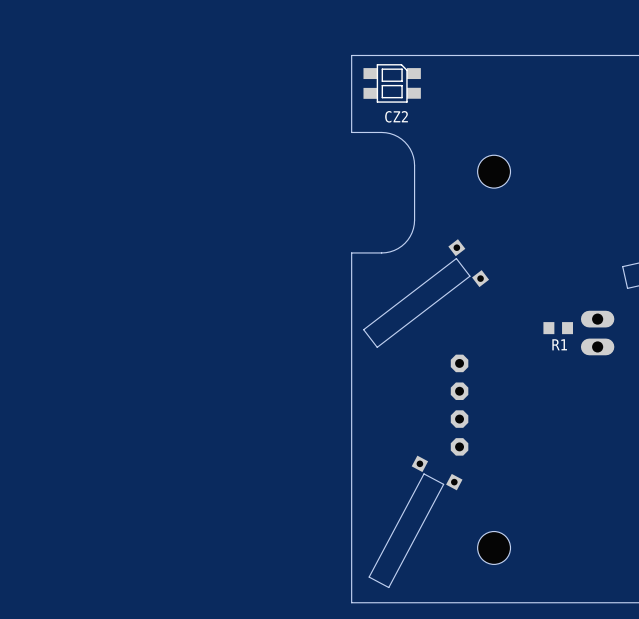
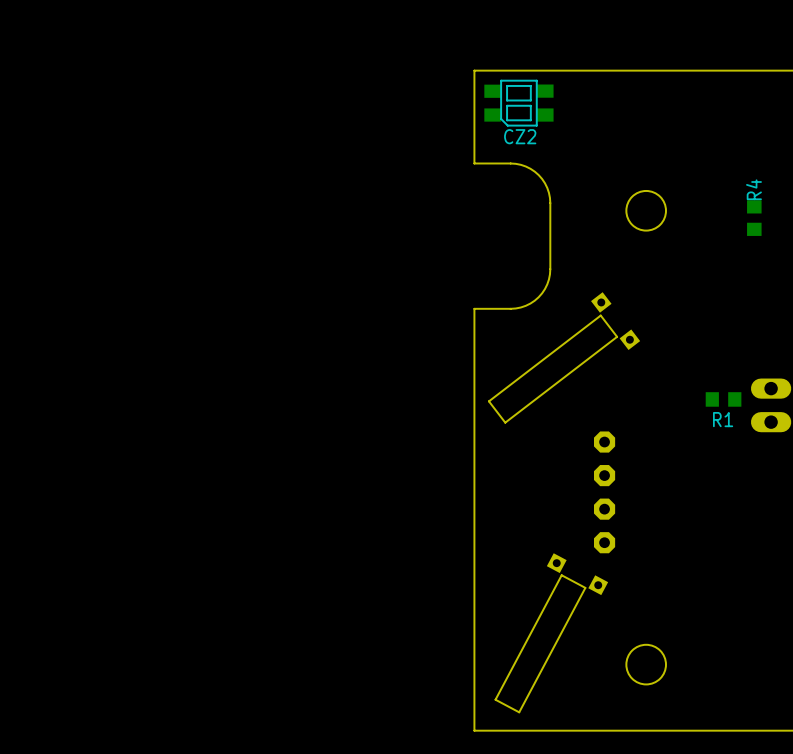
CZ2 rotation: 0° (392, 83) -> 180° (518, 103)
R4: none -> (754, 218)

